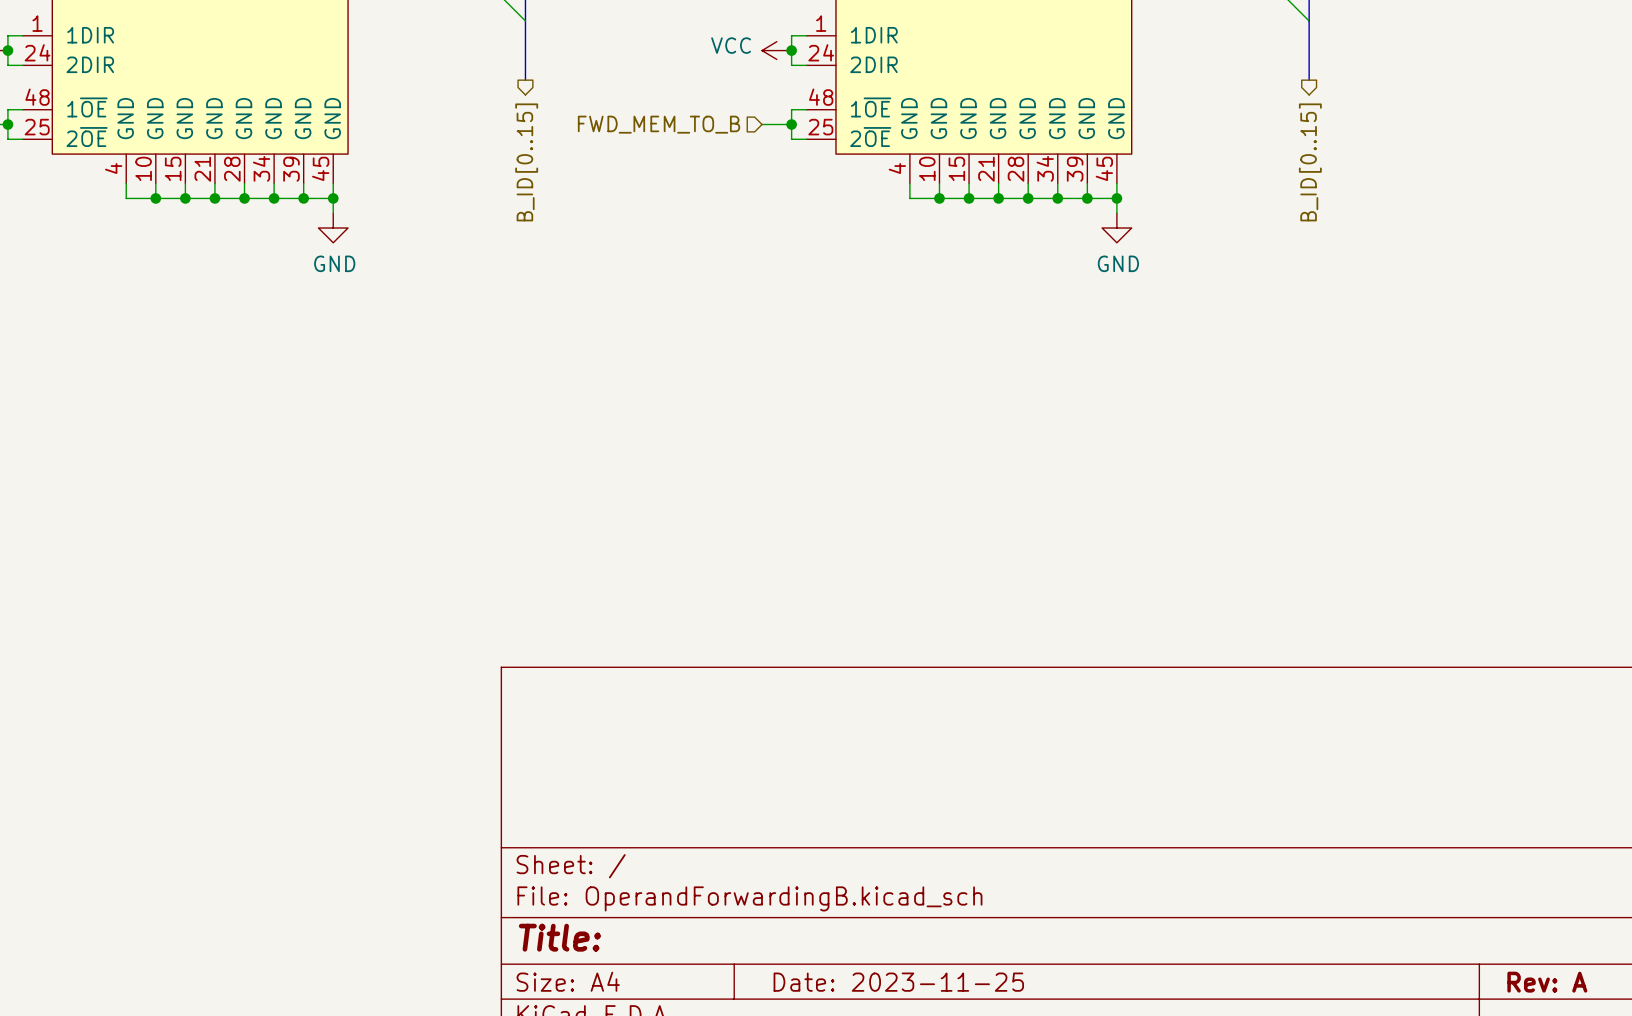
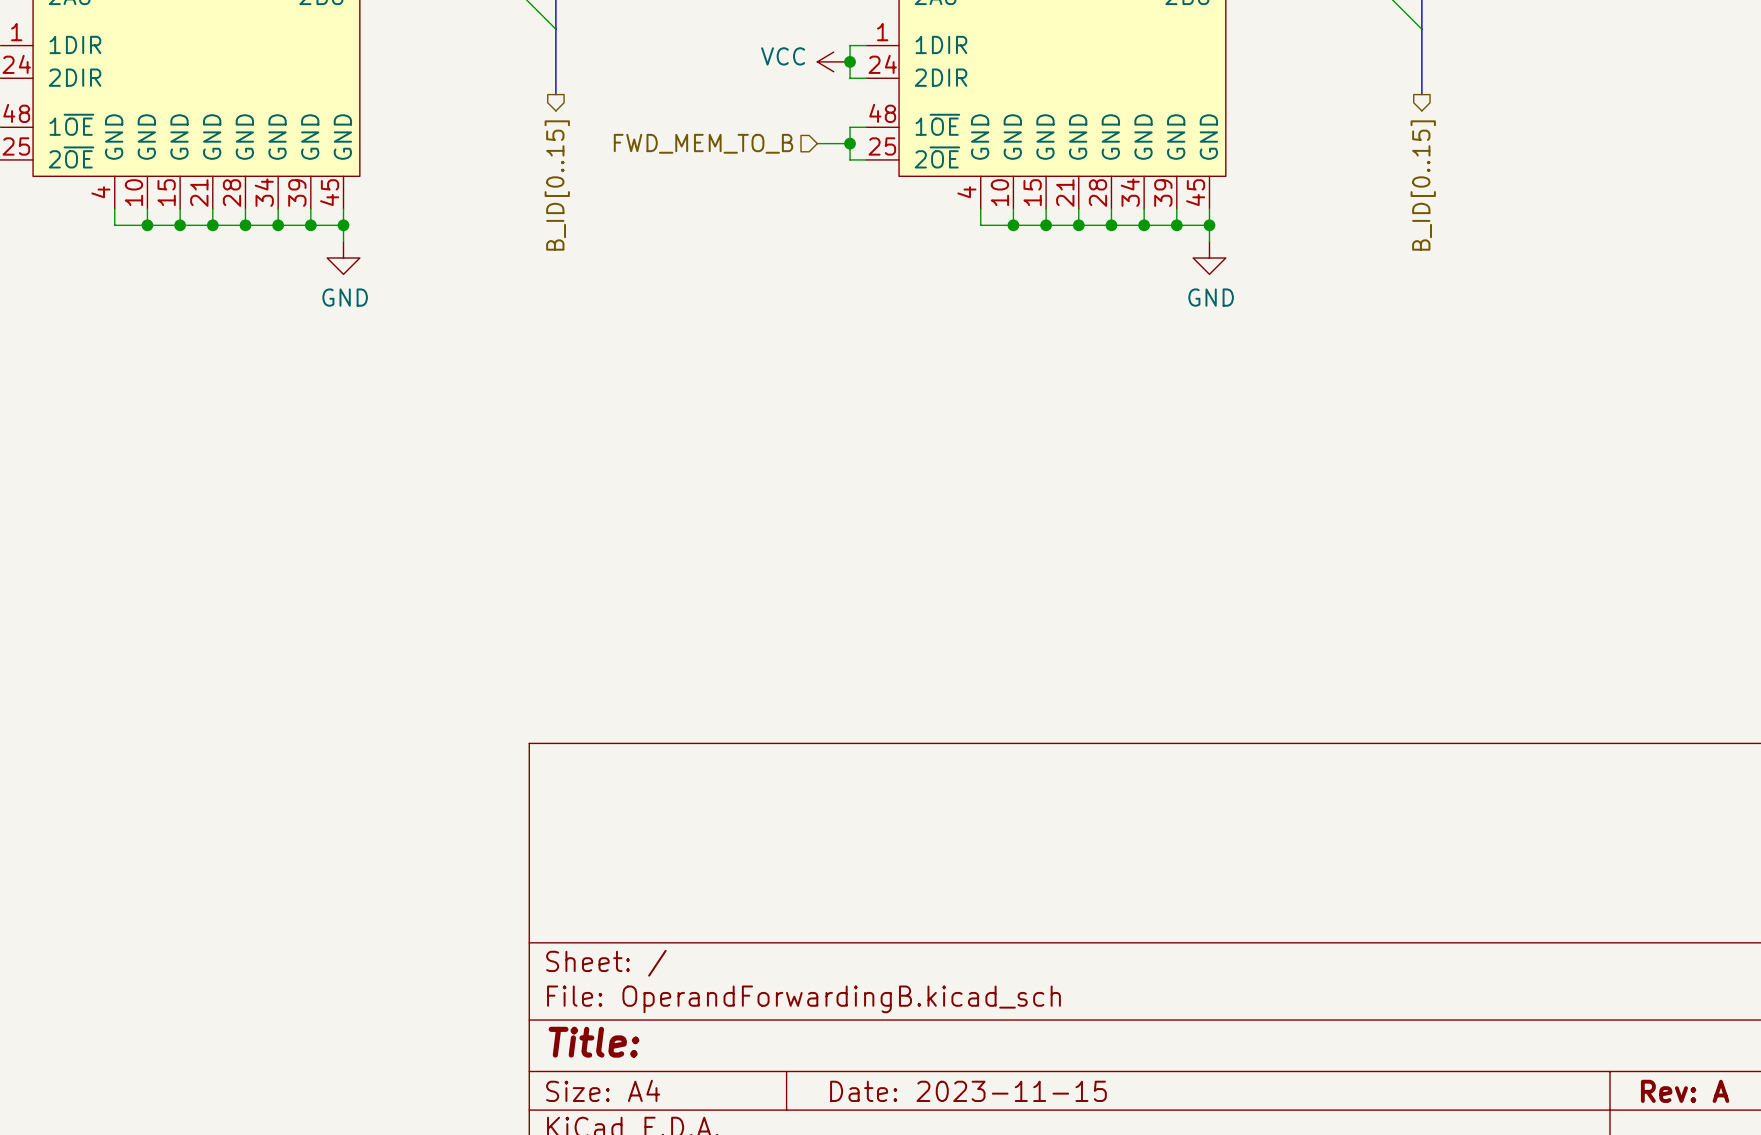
title block: Date: 2023-11-25 (898, 982) -> Date: 2023-11-15 (968, 1091)

